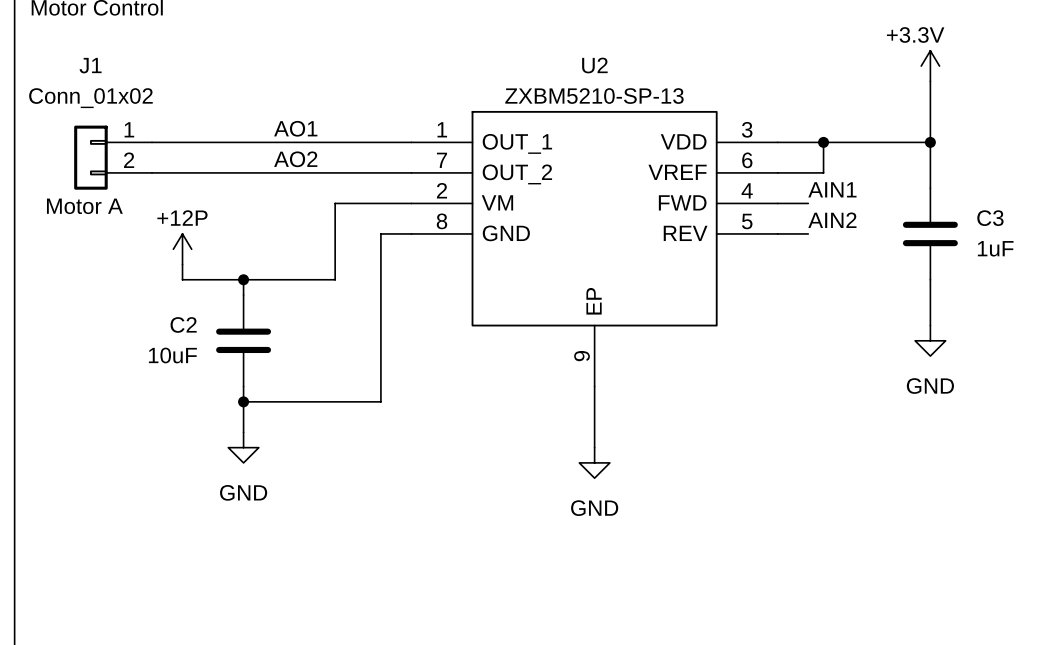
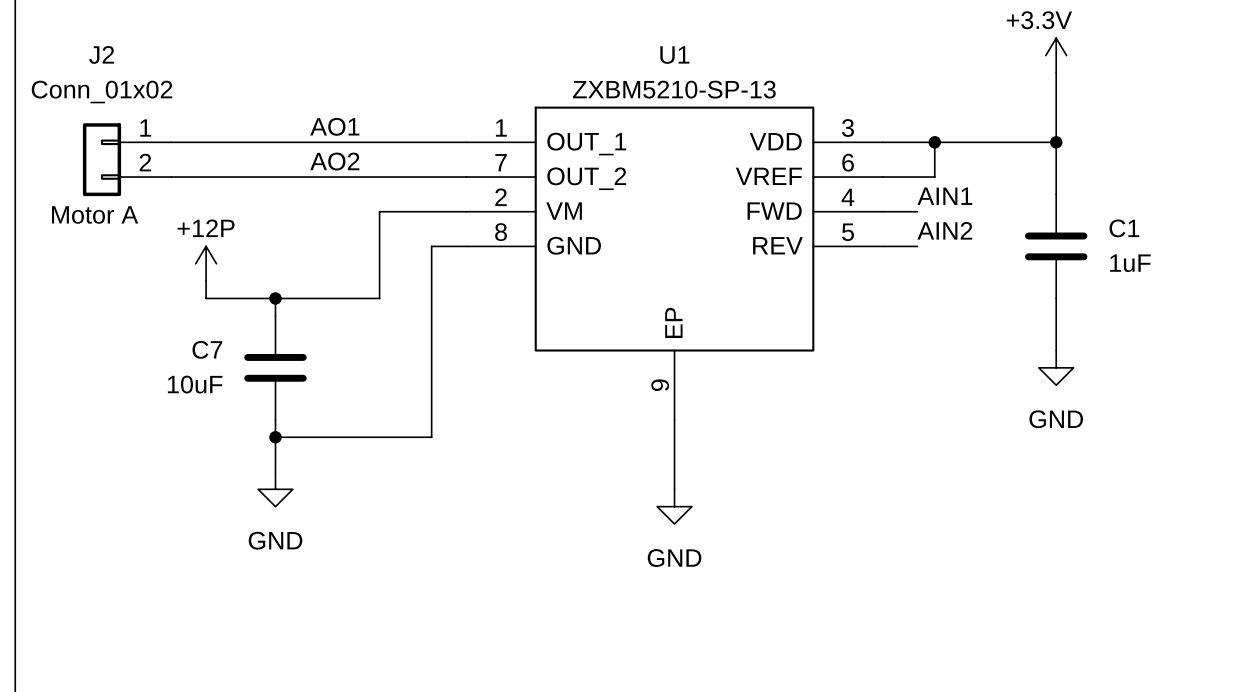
J1 name: J1 (90, 65) -> J2 (101, 54)
U2 name: U2 (594, 65) -> U1 (674, 55)
C3 name: C3 (990, 218) -> C1 (1124, 228)
C2 name: C2 (183, 324) -> C7 (207, 349)

